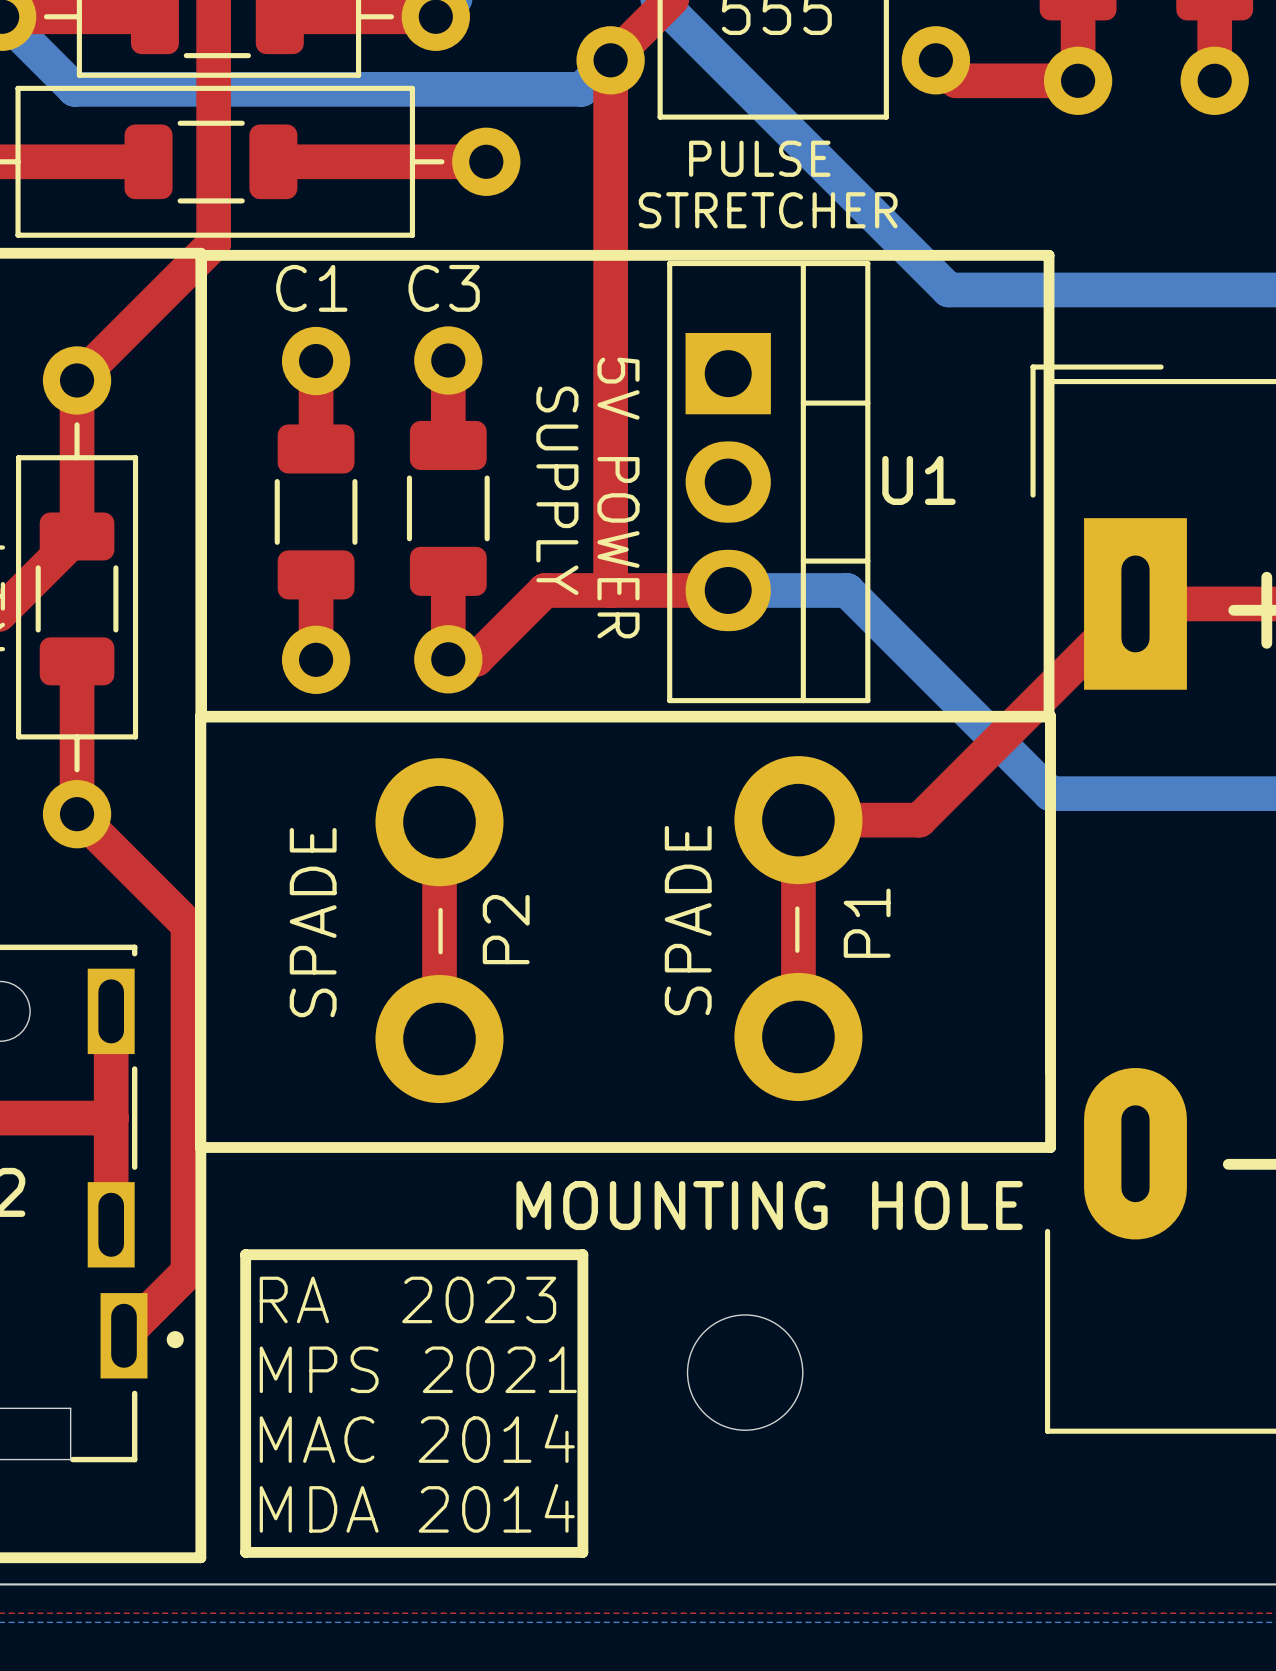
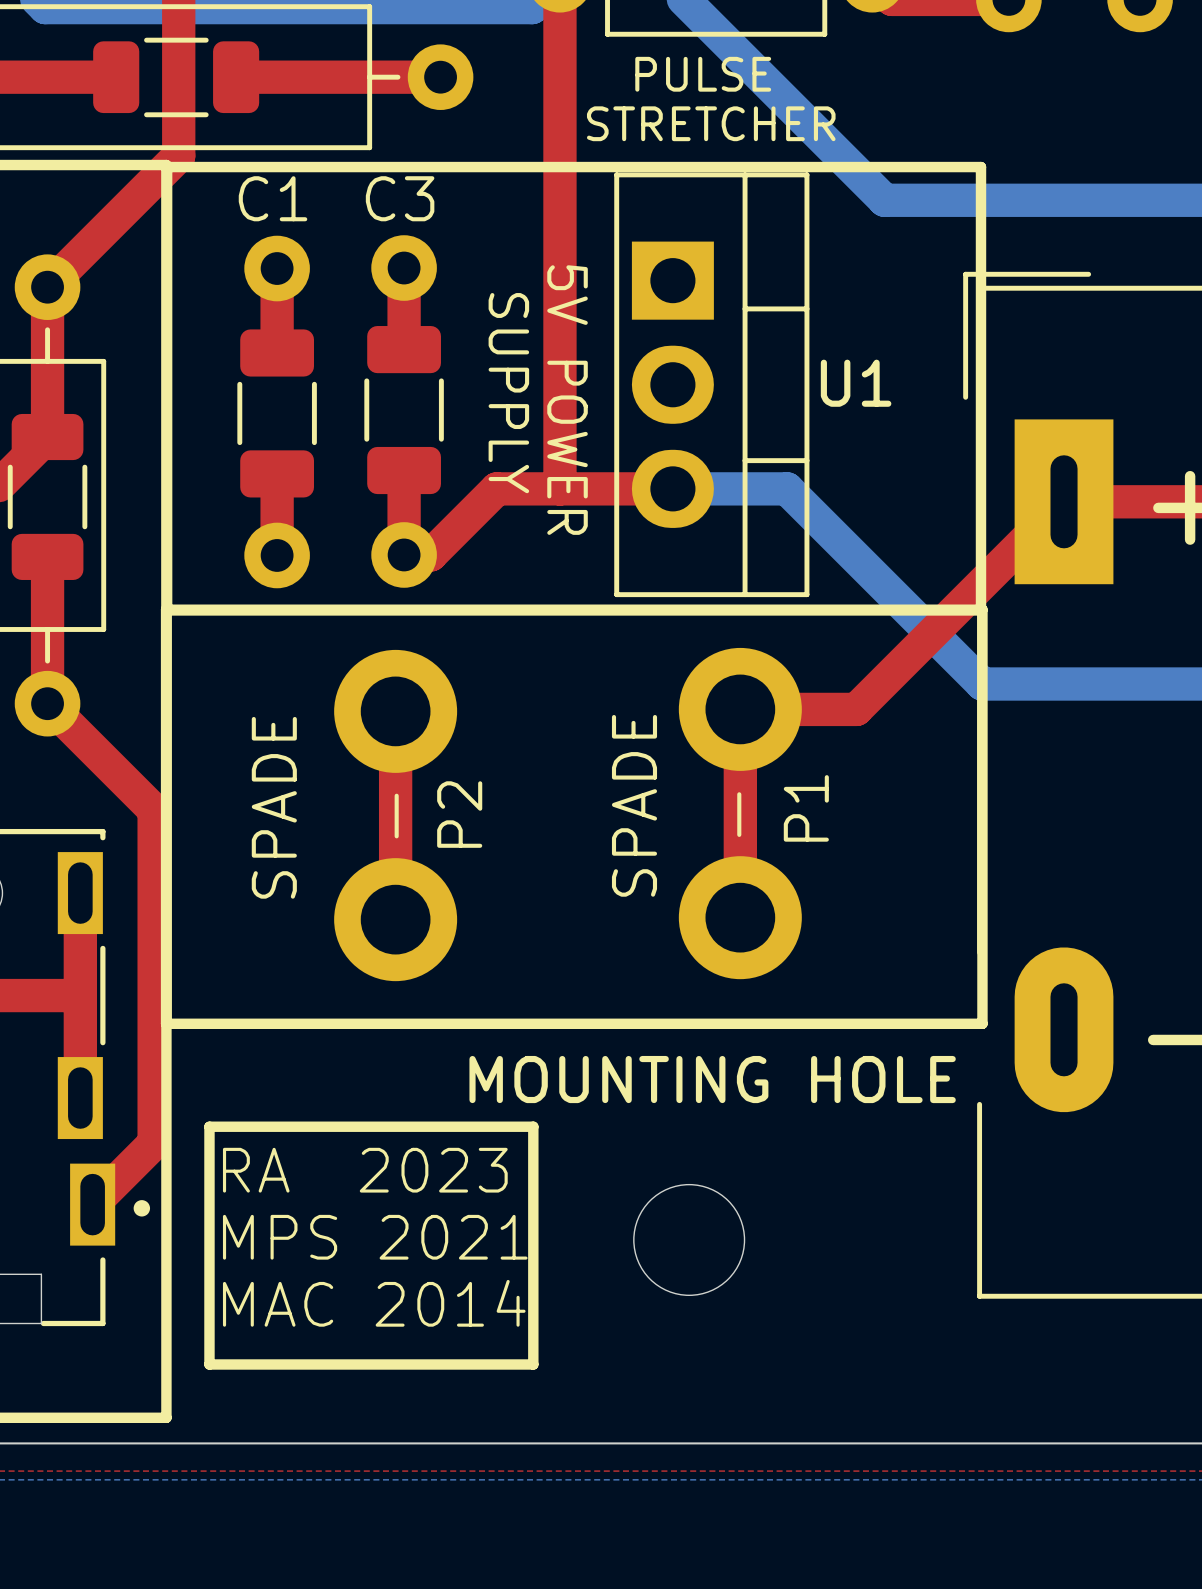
line: (245, 1502) (245, 1552) (582, 1552) (582, 1502) -> (209, 1364) (533, 1364)
text: MDA 2014 (417, 1508) -> none

